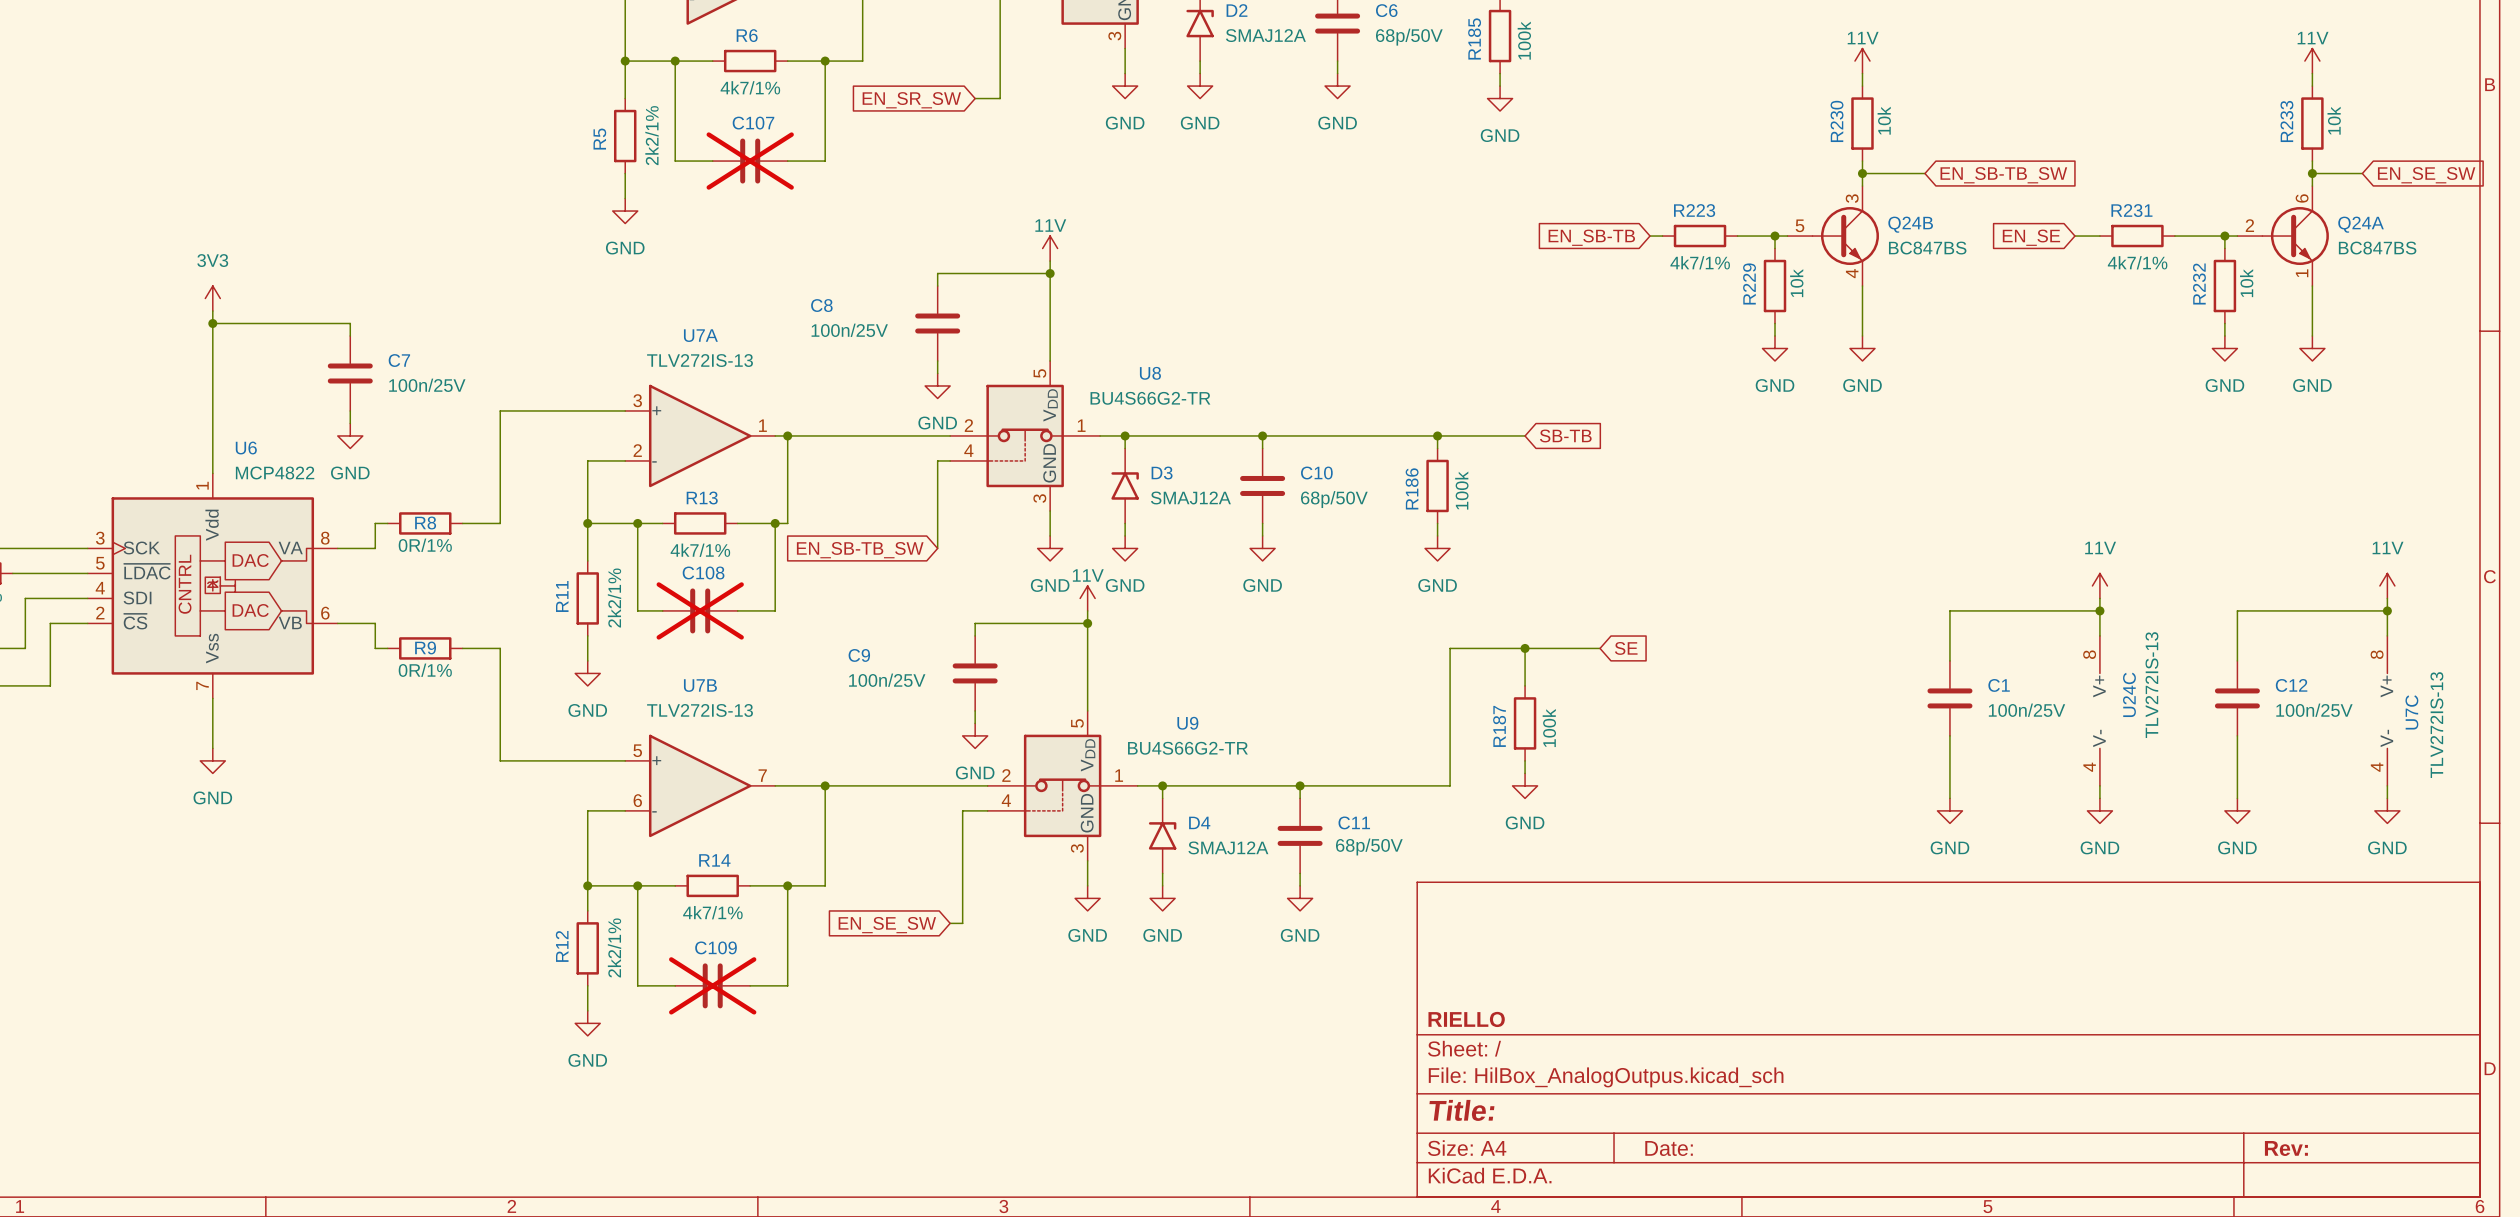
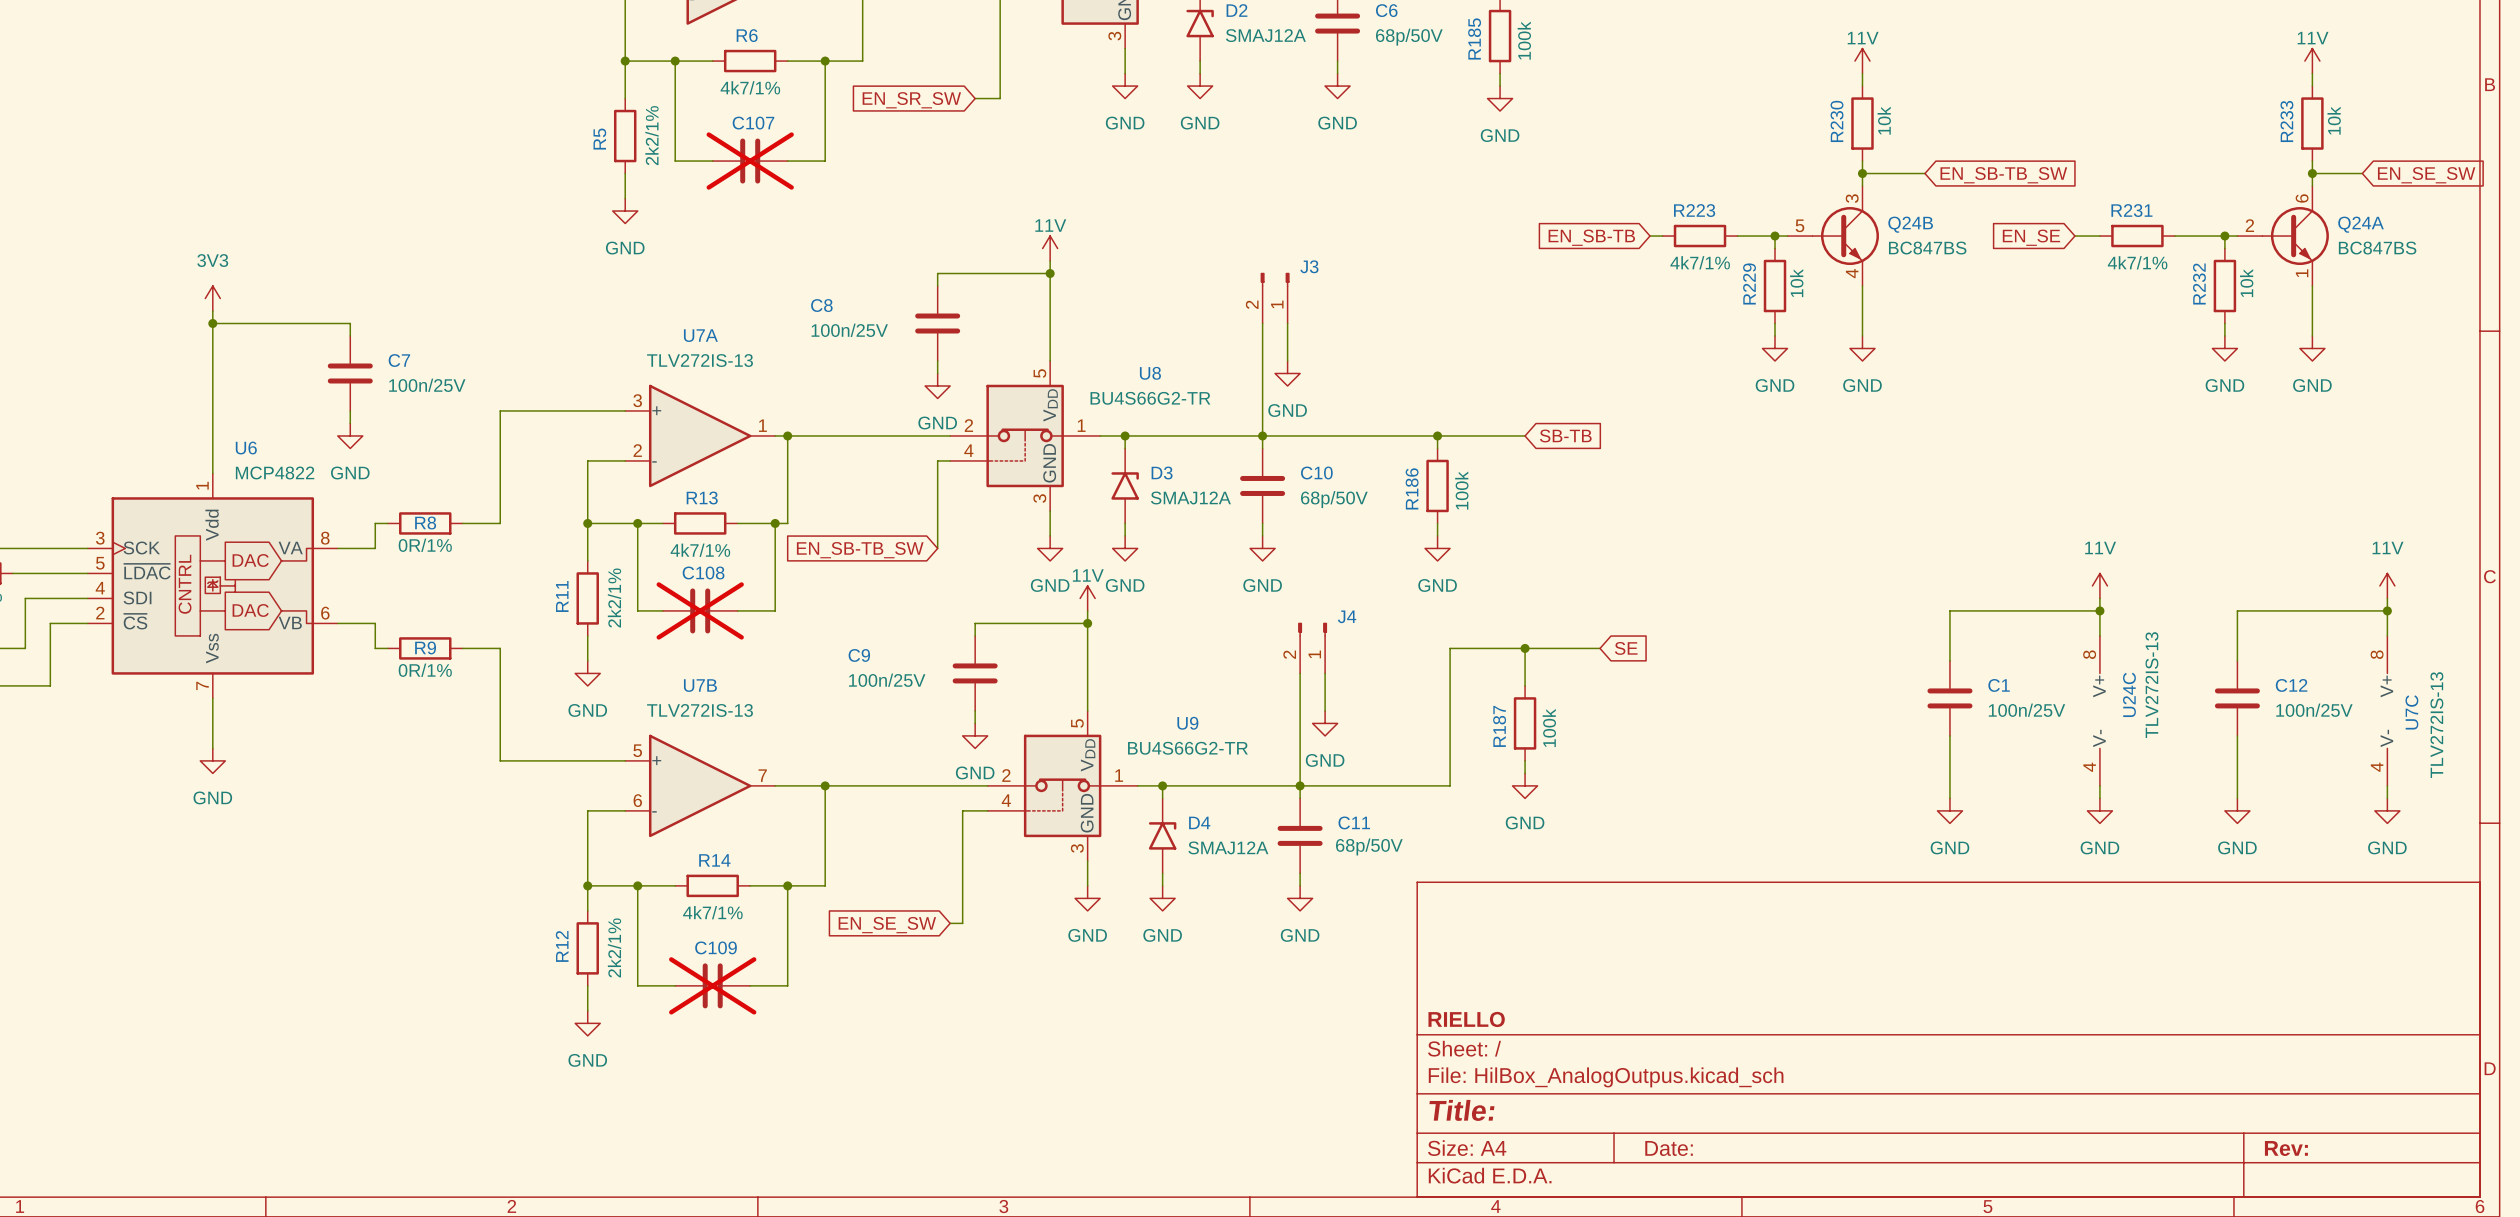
J3: none -> (1275, 298)
wire: none -> (1262, 323) (1262, 435)
wire: none -> (1287, 323) (1287, 360)
power symbol: none -> GND (1287, 373)
J4: none -> (1312, 648)
wire: none -> (1300, 673) (1300, 785)
wire: none -> (1325, 673) (1325, 710)
power symbol: none -> GND (1325, 723)

